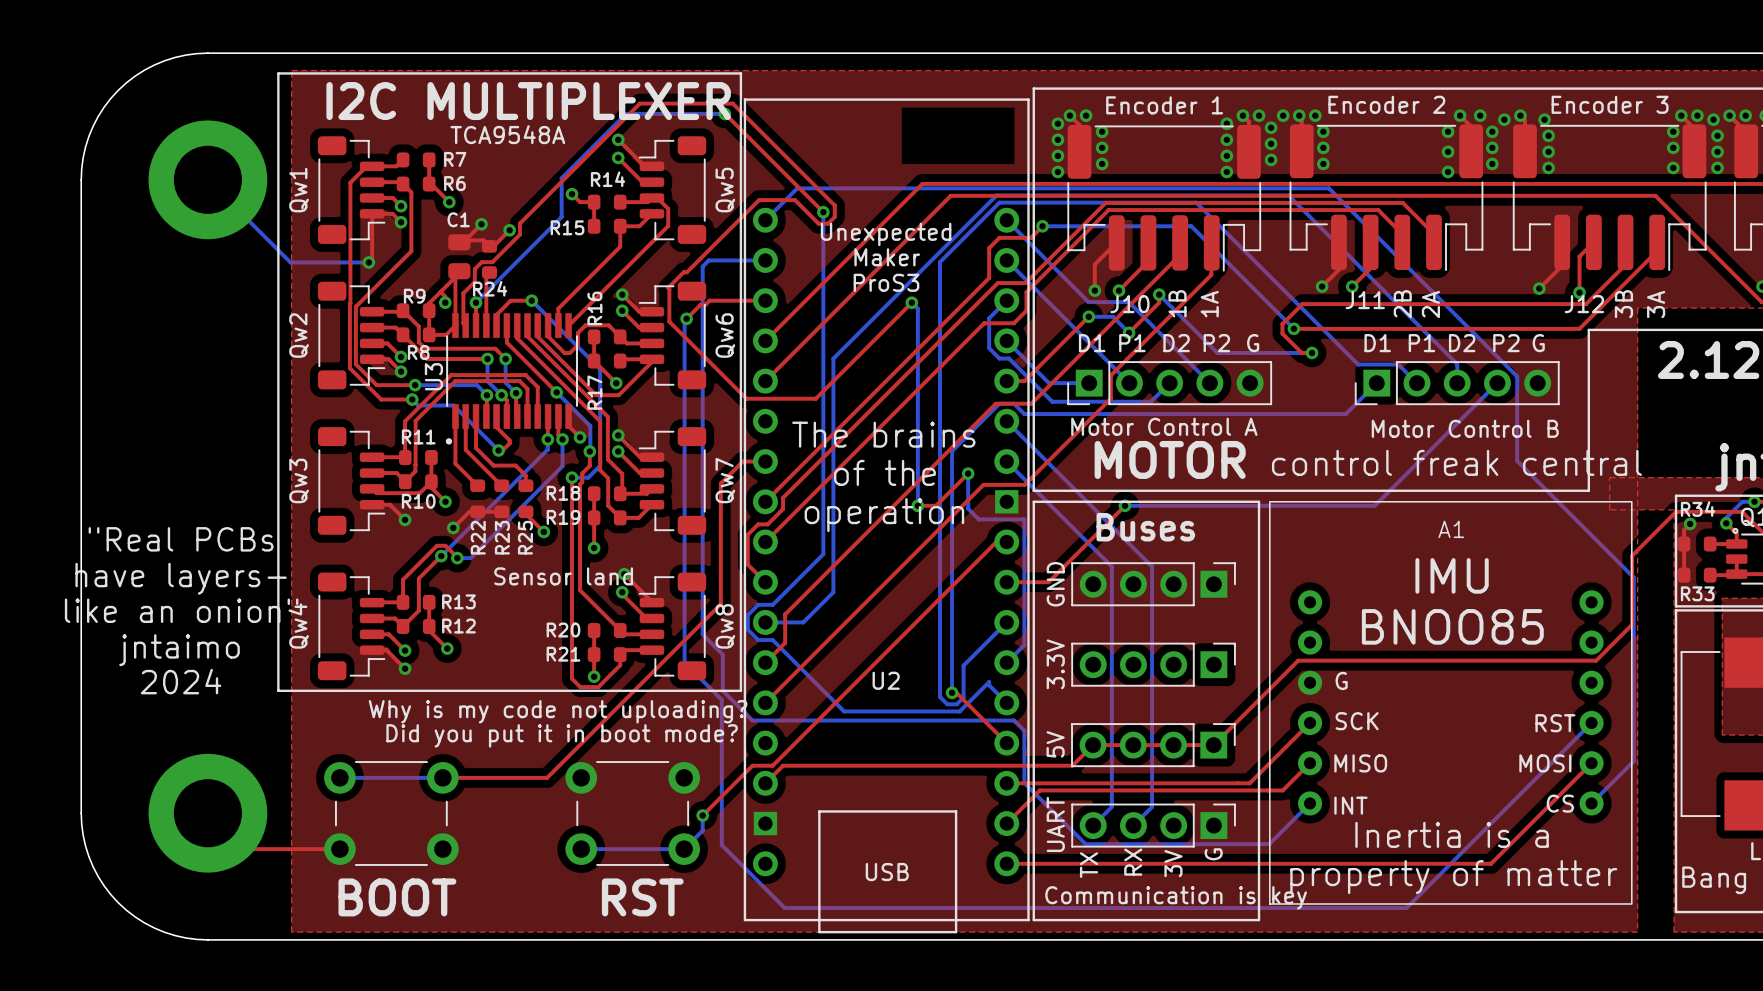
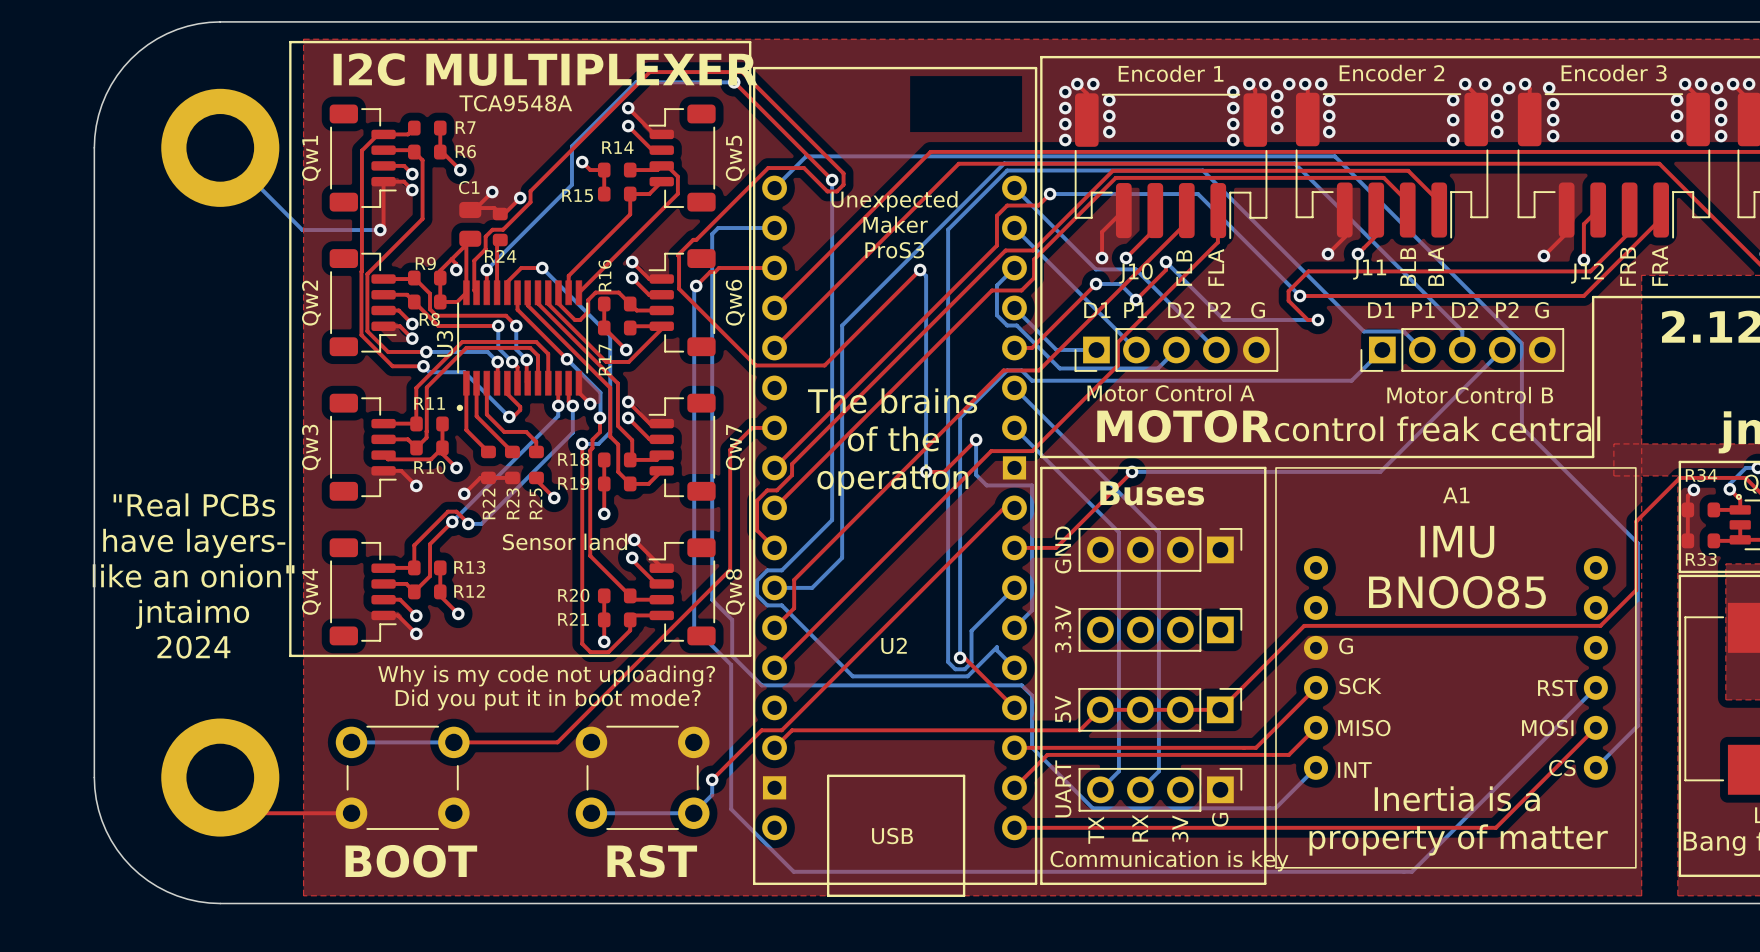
text: 1B (1177, 303) -> FLB (1184, 268)
text: 1A (1209, 304) -> FLA (1216, 267)
text: 2B (1402, 304) -> BLB (1408, 266)
text: 2A (1430, 304) -> BLA (1436, 266)
text: 3B (1623, 304) -> FRB (1628, 266)
text: 3A (1656, 304) -> FRA (1660, 265)

